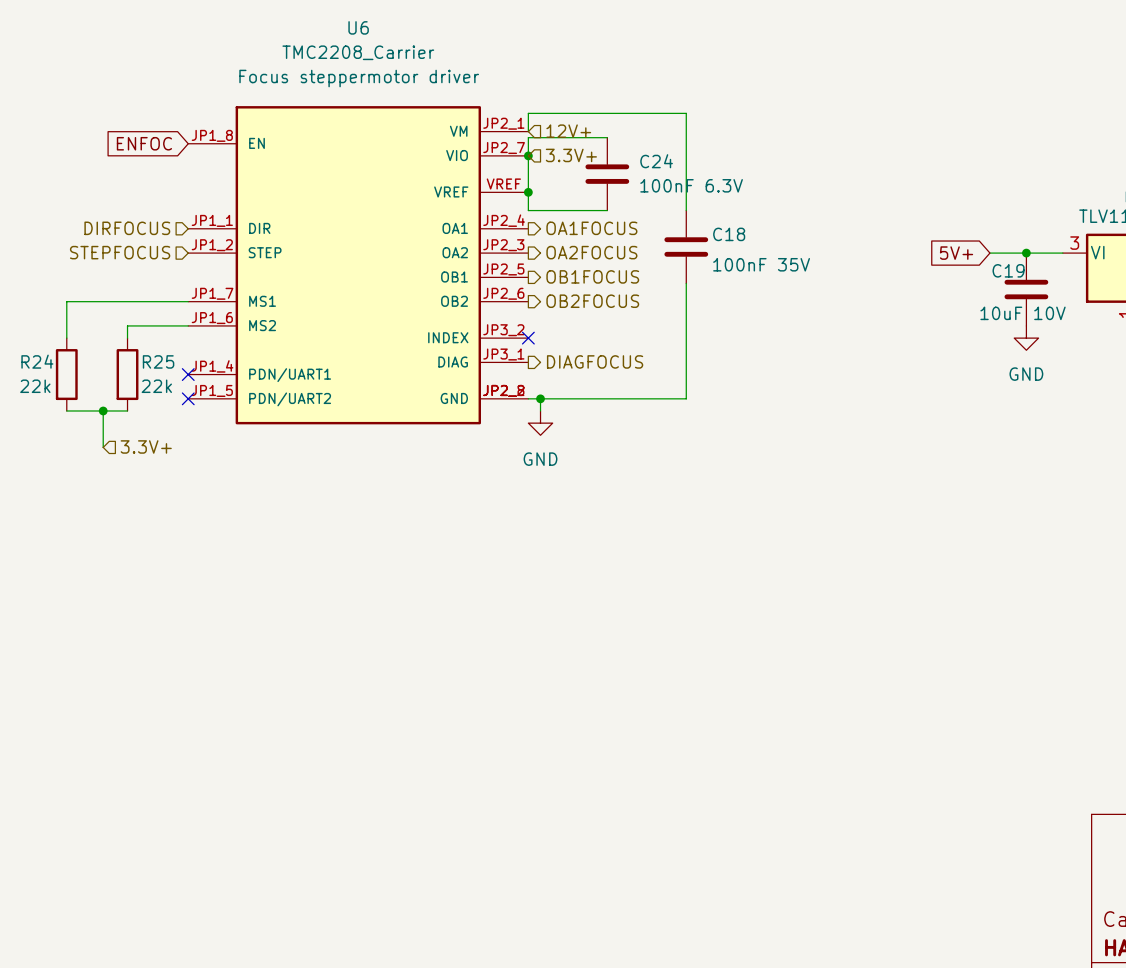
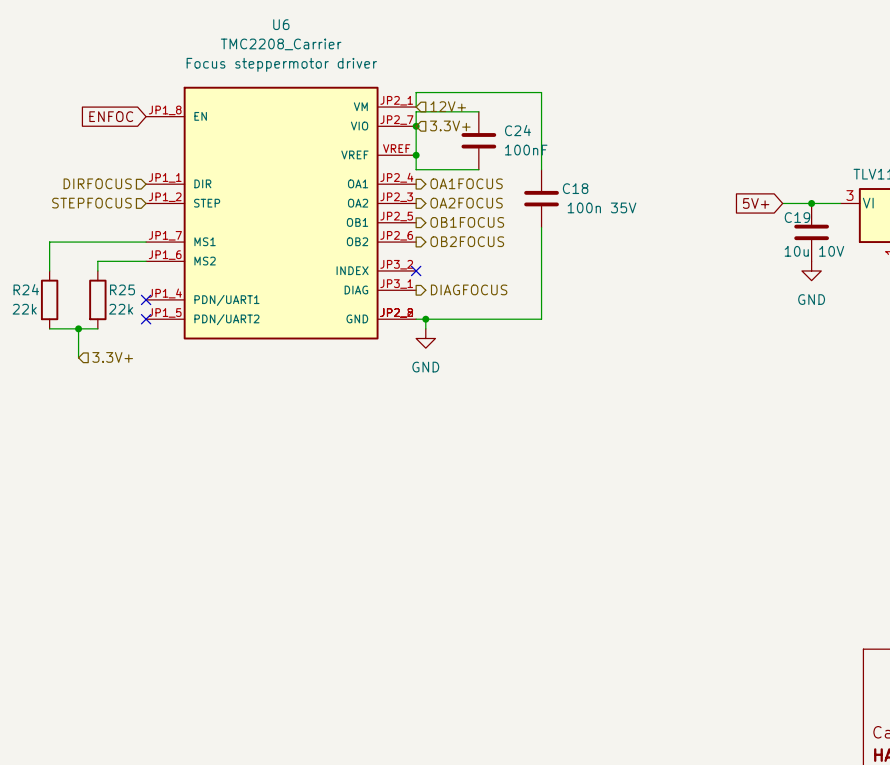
C24 value: 100nF 6.3V (691, 185) -> 100nF (526, 150)
C18 value: 100nF 35V (761, 264) -> 100n 35V (602, 207)
C19 value: 10uF 10V (1023, 313) -> 10u 10V (814, 251)

